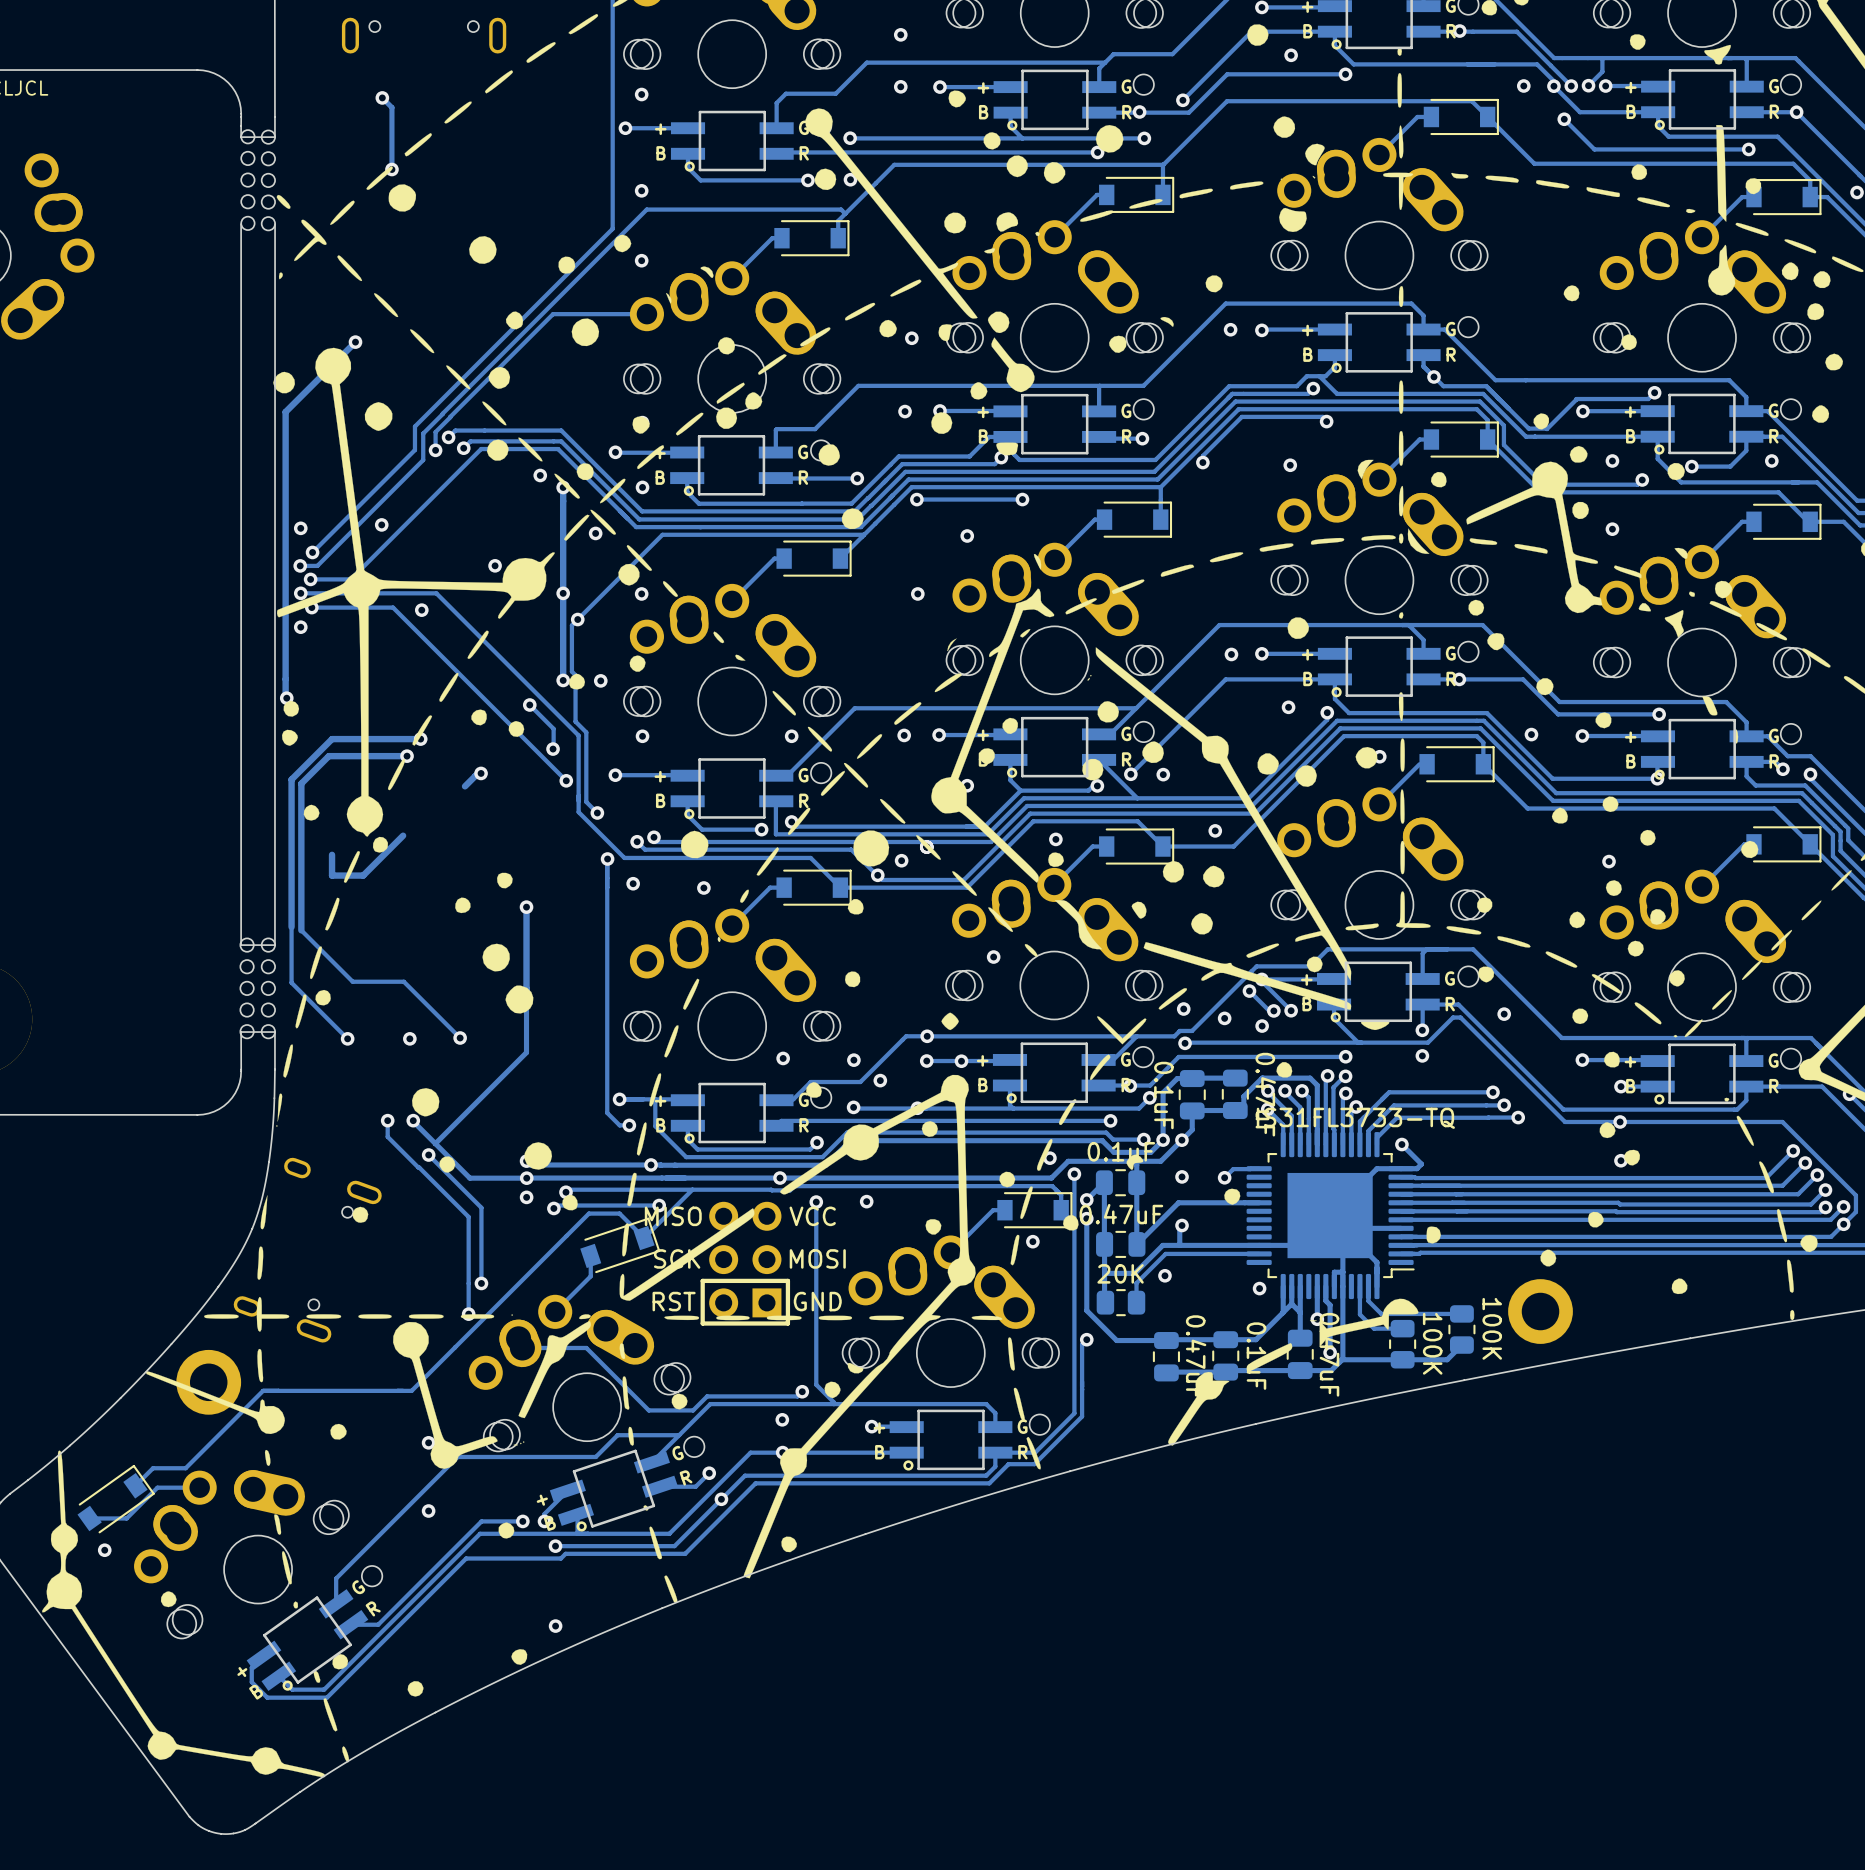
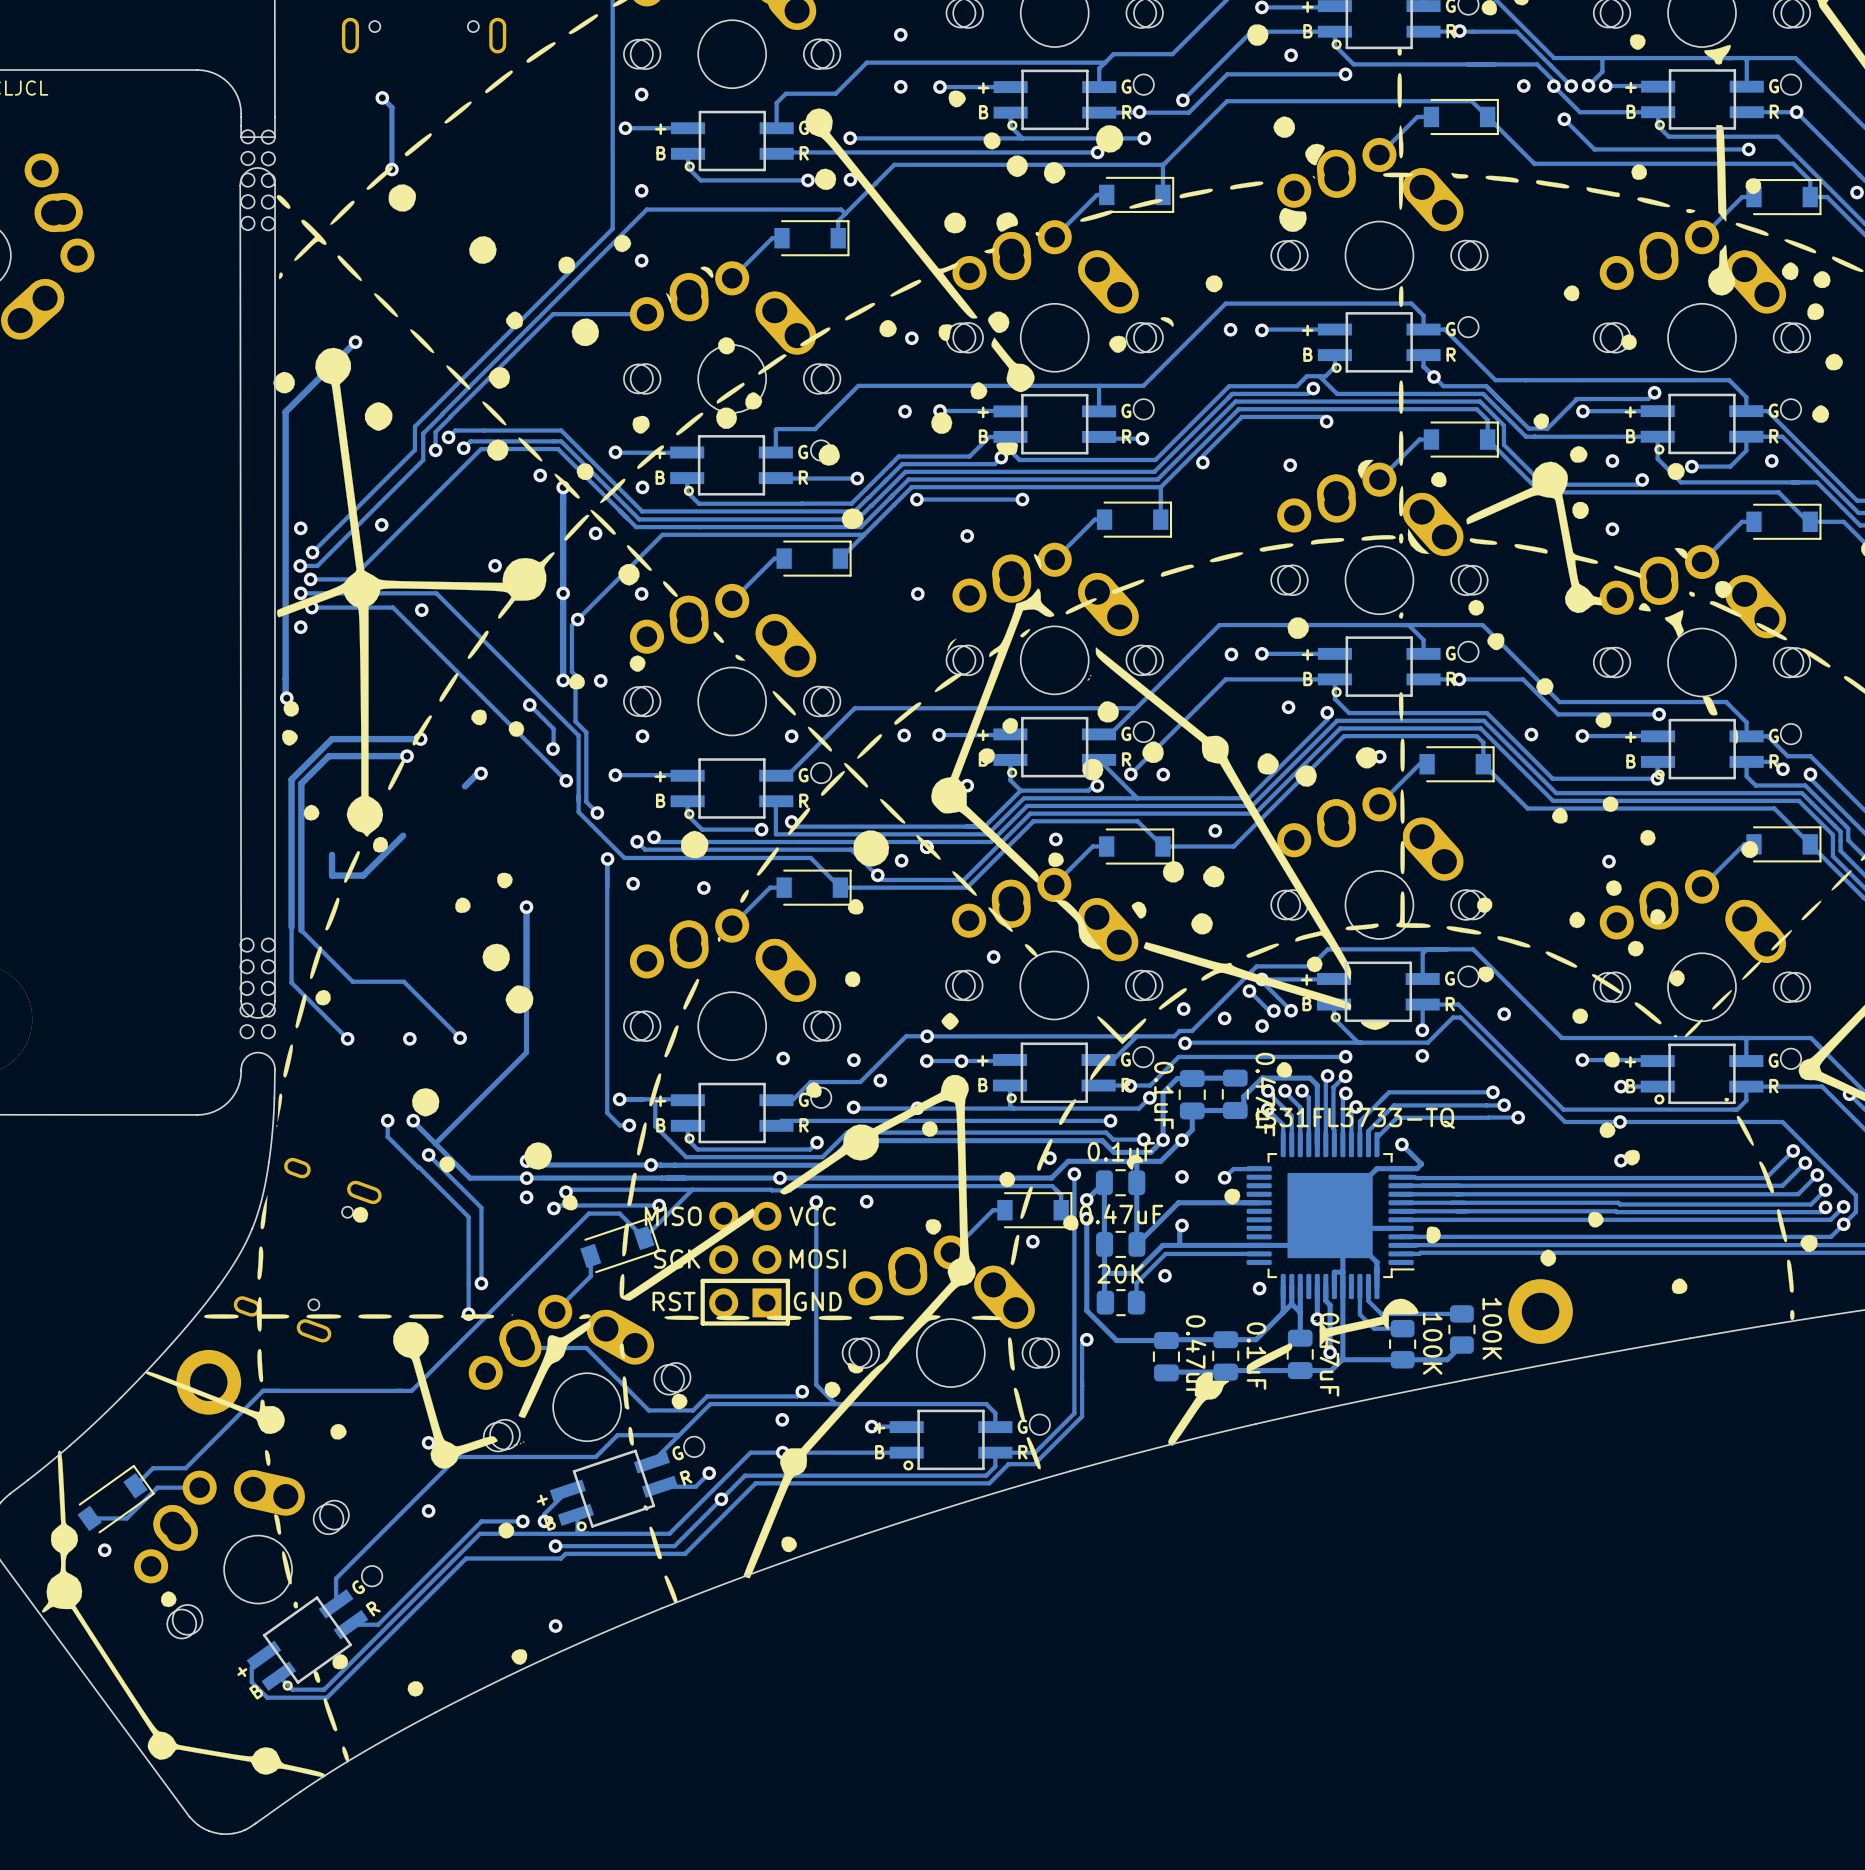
board edge: (241, 224) (241, 945) (274, 945) -> (275, 224) (273, 179) (265, 169) (259, 168) (251, 169) (243, 175) (240, 185) (241, 1001) (244, 1011) (253, 1017) (266, 1015) (274, 1005) (274, 945)
board edge: (274, 1069) (274, 1032) (241, 1032) (241, 1069) -> (274, 1069) (270, 1057) (258, 1052) (246, 1057) (241, 1069)

